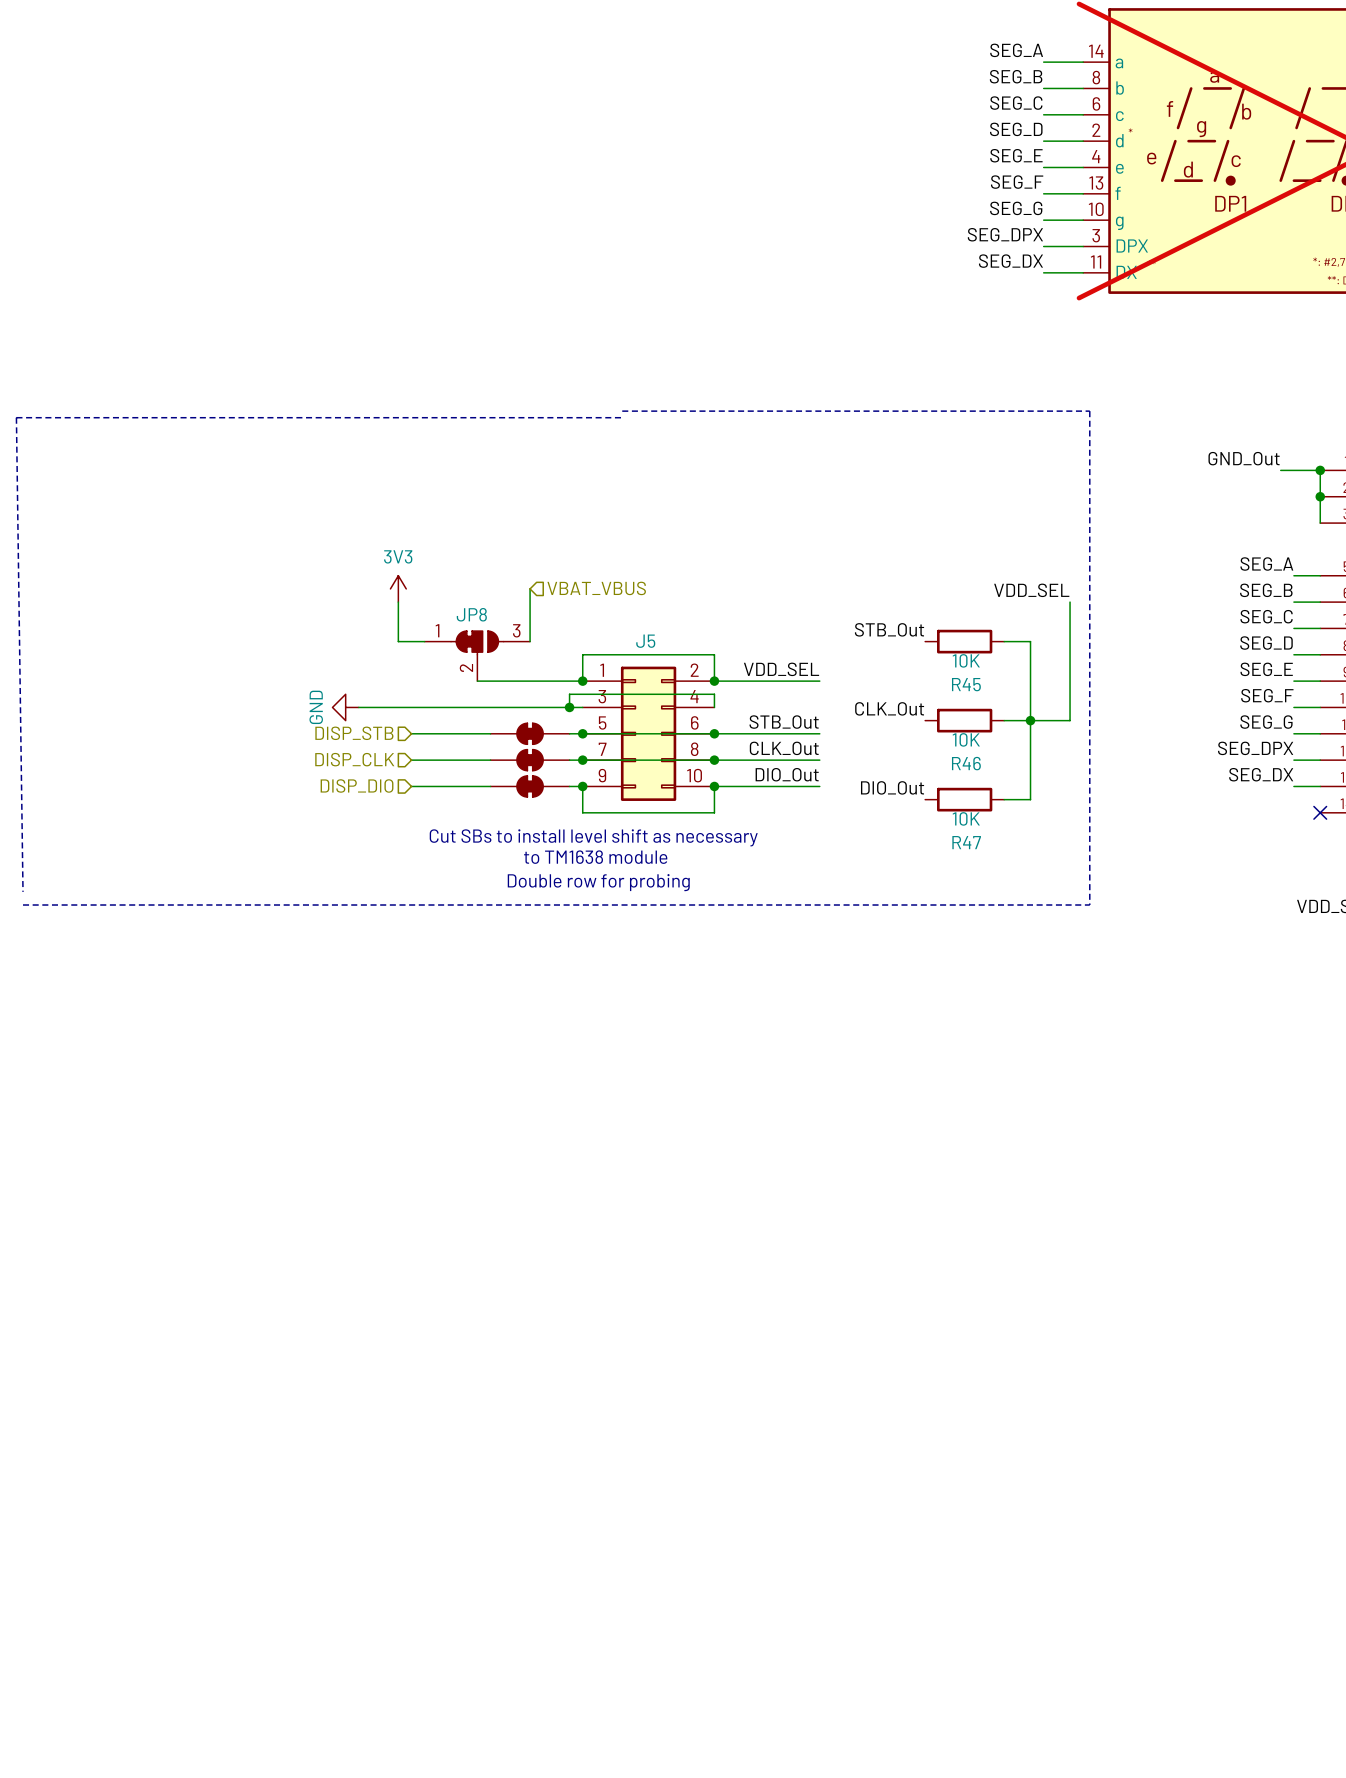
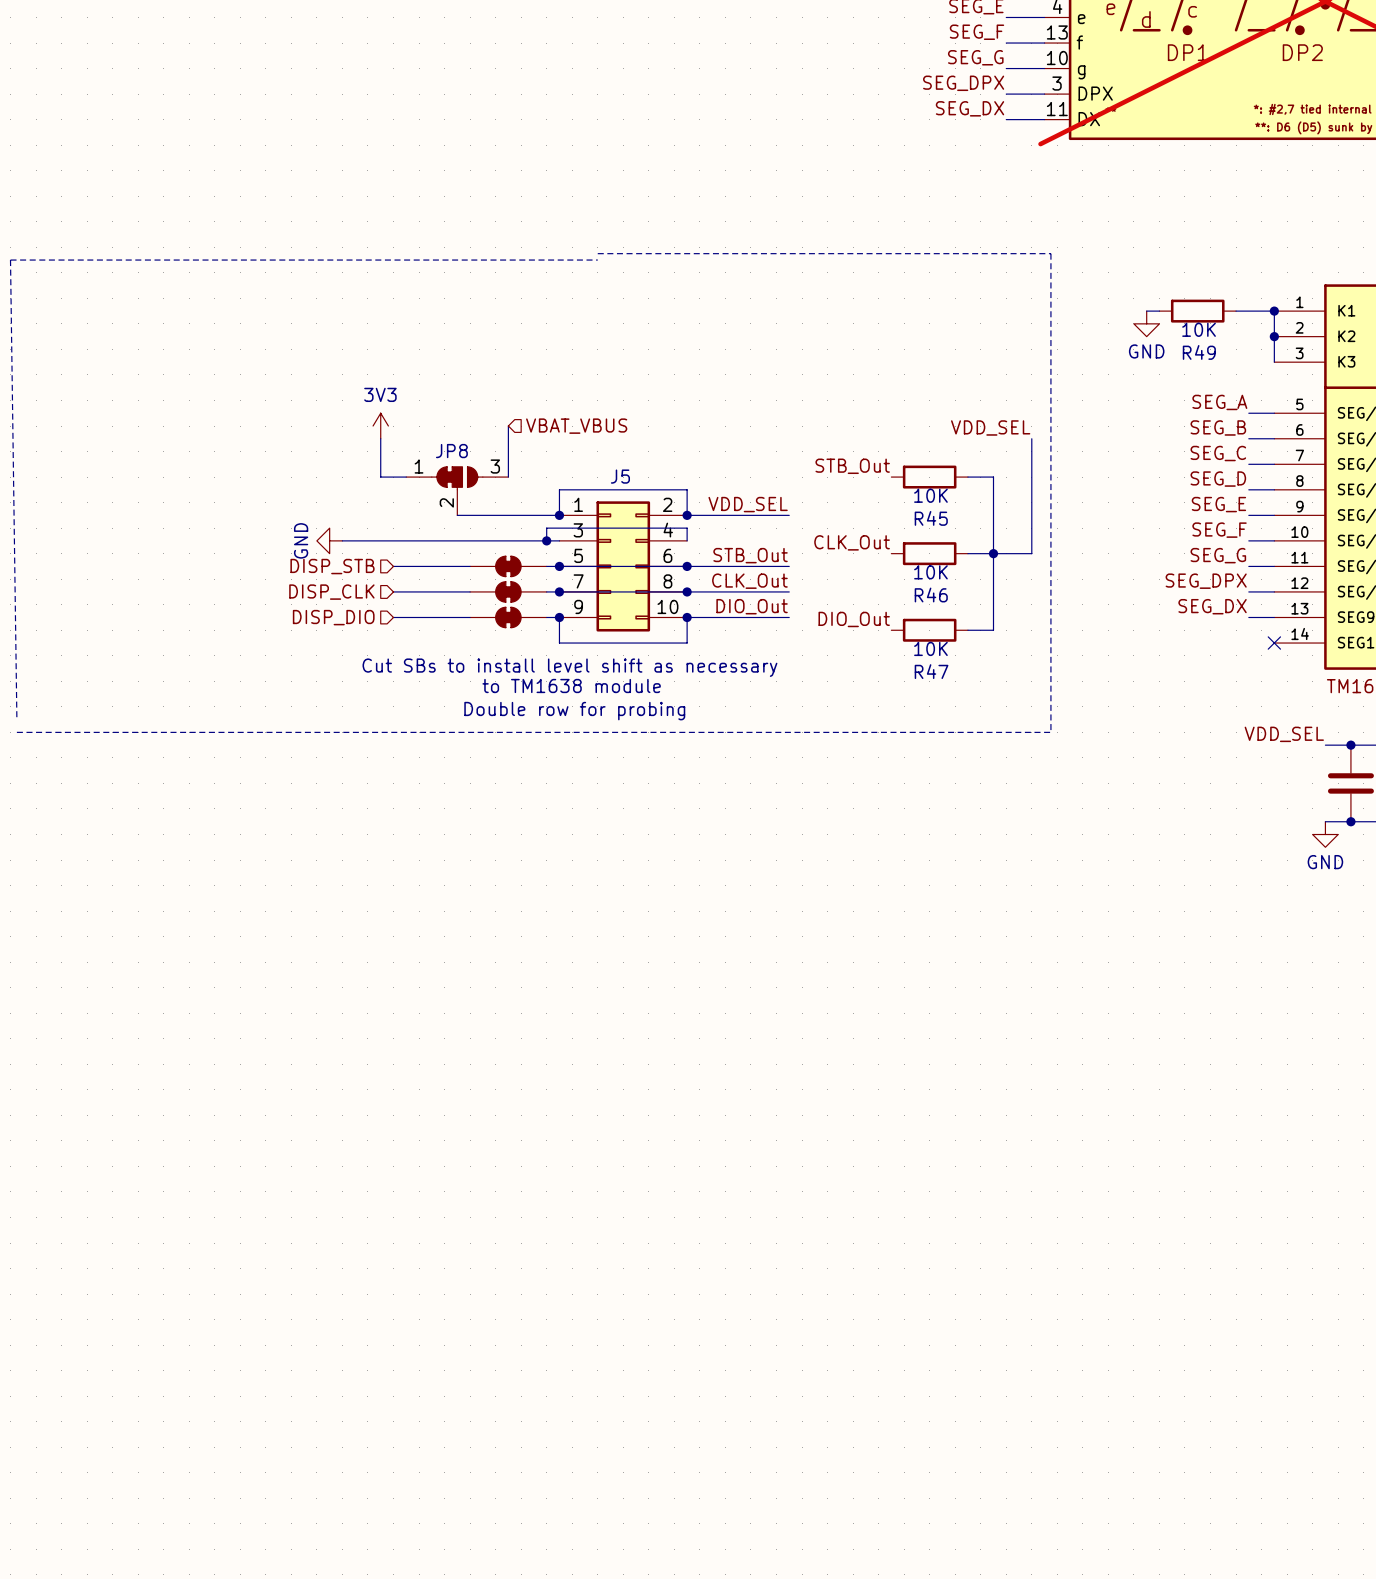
label: GND_Out (1244, 458) -> none
wire: none -> (1146, 311) (1159, 311)
R49: none -> 10K (1197, 311)
power symbol: none -> GND (1146, 323)

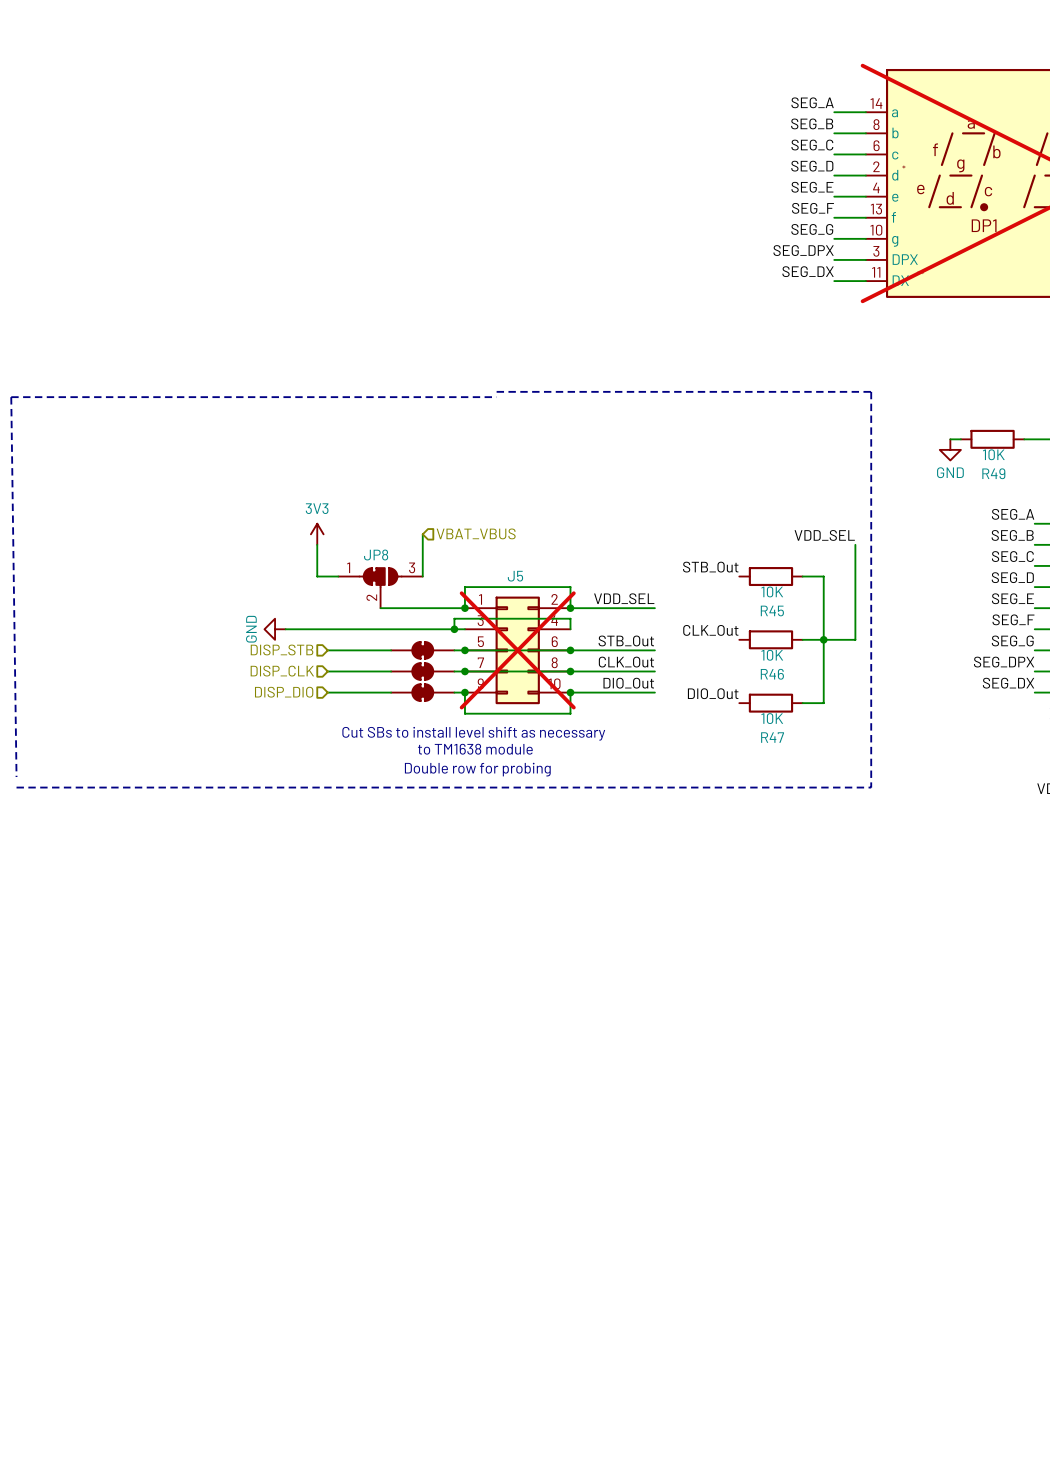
J5 do-not-place cross: none -> (517, 650)

